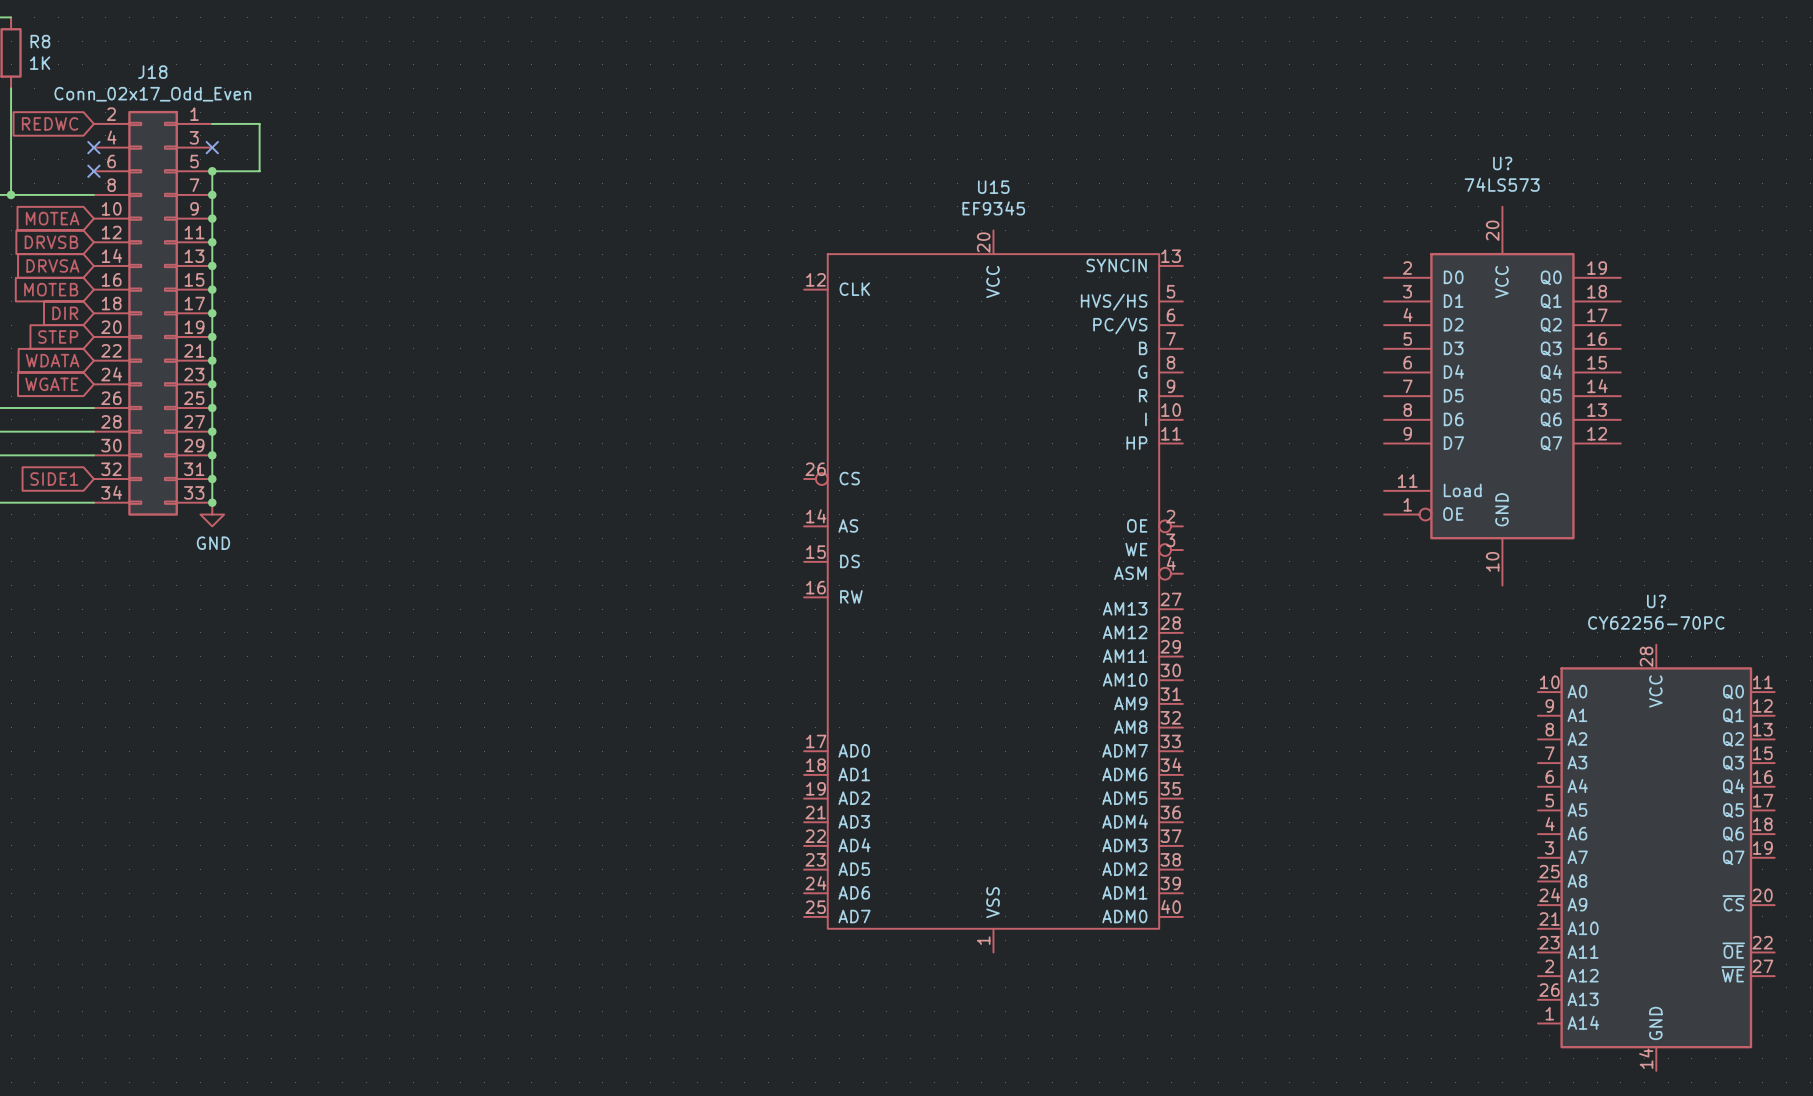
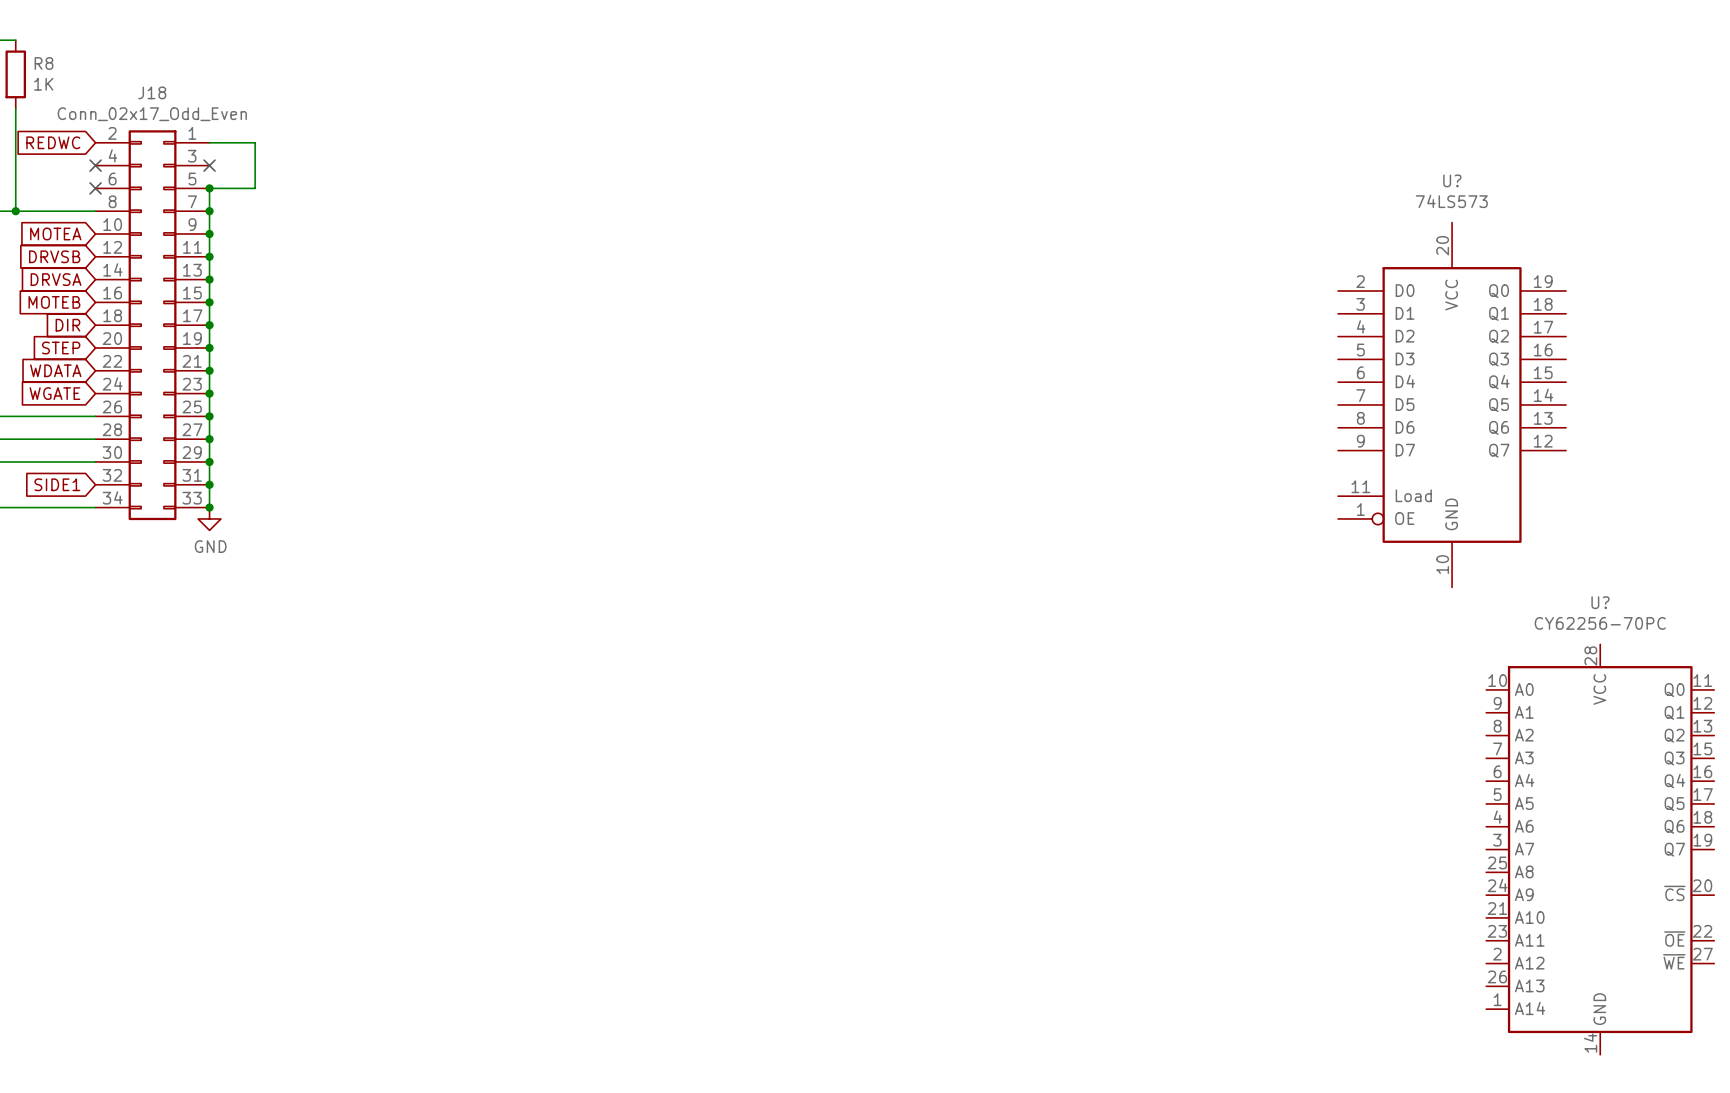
U15: EF9345 (993, 591) -> none

